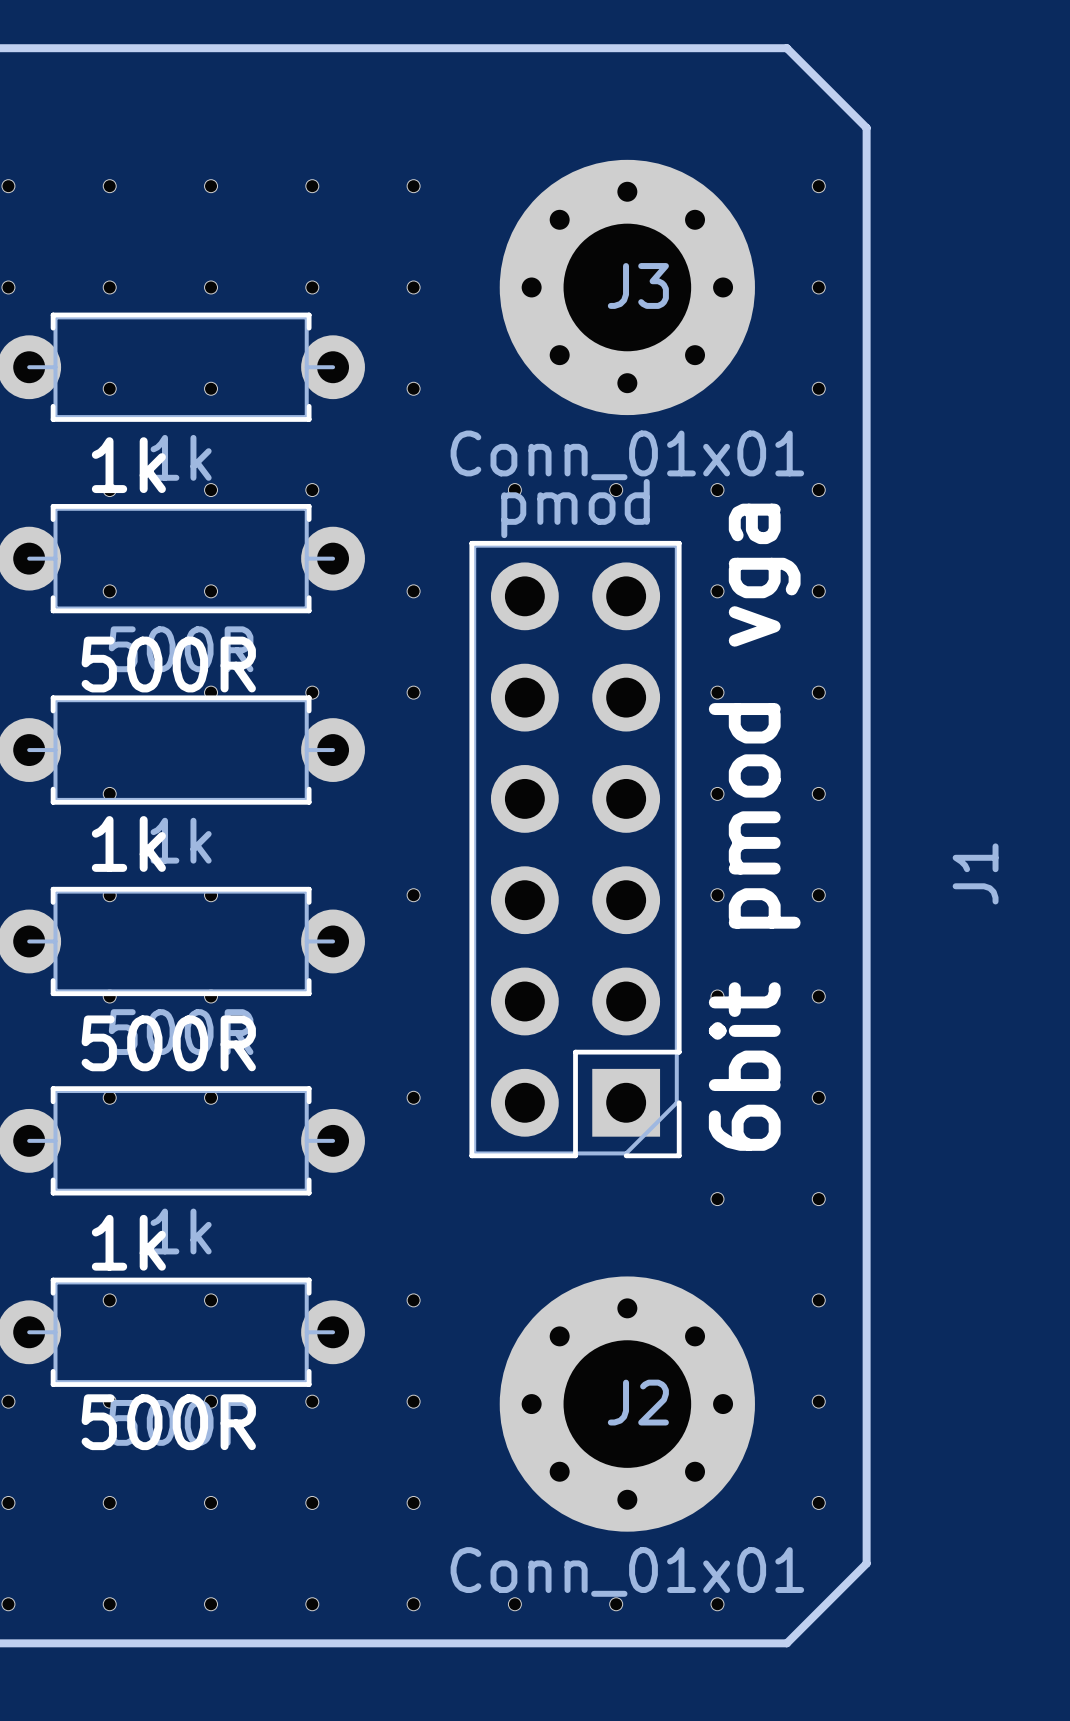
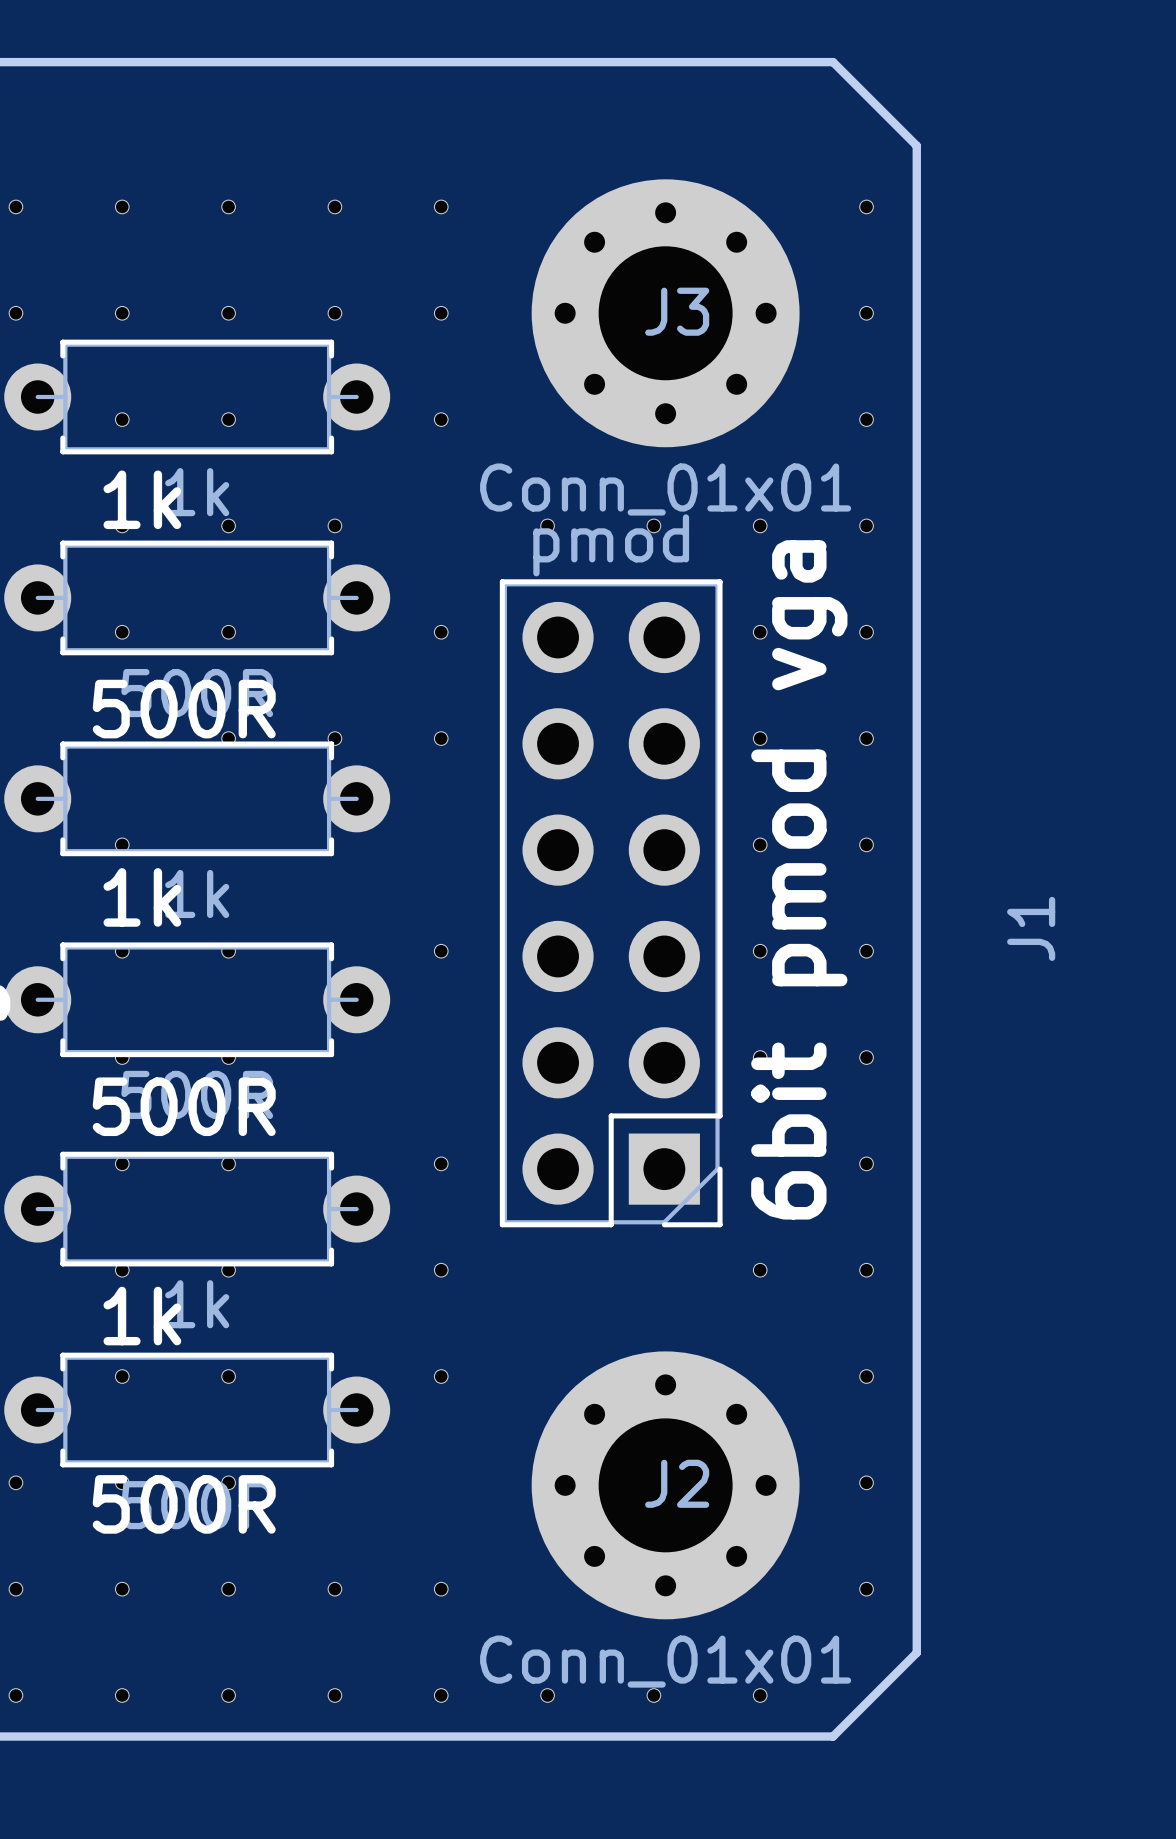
part: none -> (122, 1270)
part: none -> (228, 1270)
part: none -> (441, 1270)
part: (312, 1401) -> none
part: (413, 1401) -> none

